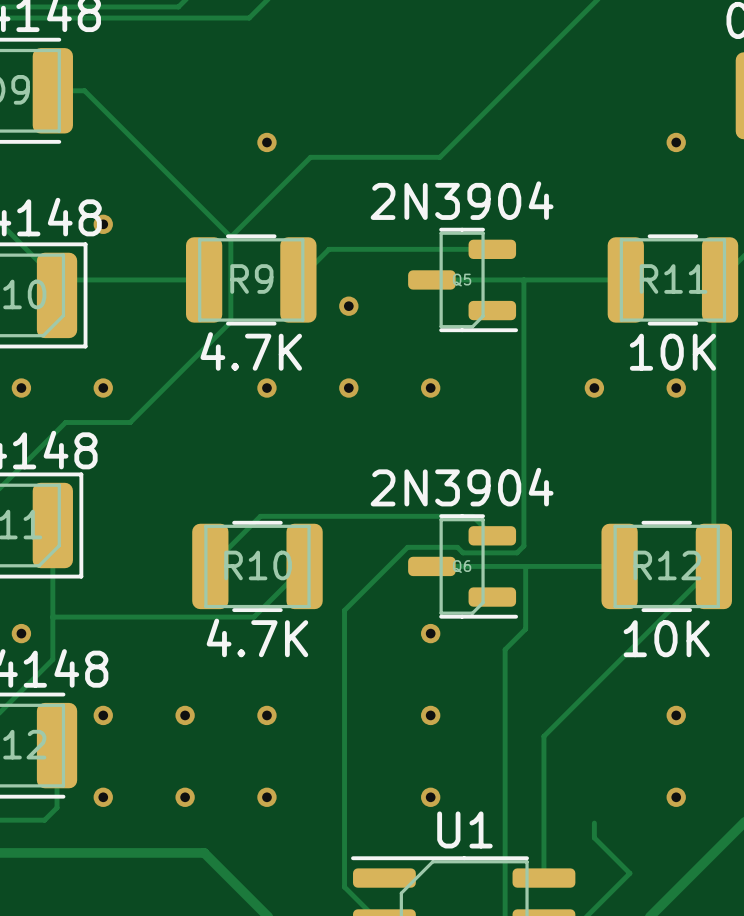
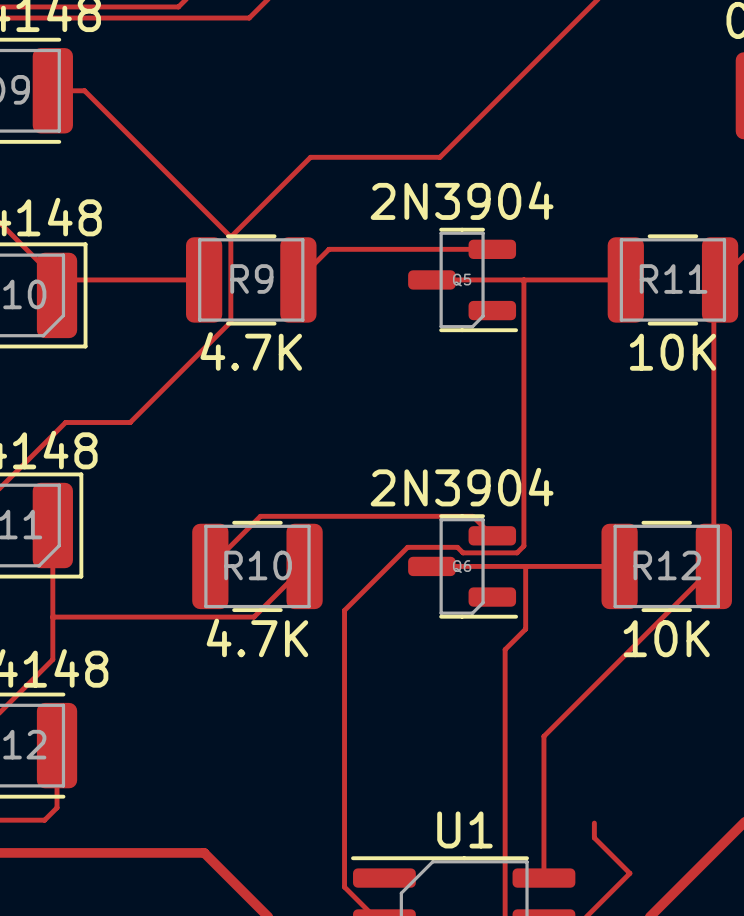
via: (266, 142) -> none
via: (676, 142) -> none
via: (103, 224) -> none
via: (348, 306) -> none
via: (21, 388) -> none
via: (103, 388) -> none
via: (266, 388) -> none
via: (348, 388) -> none
via: (430, 388) -> none
via: (594, 388) -> none
via: (676, 388) -> none
via: (21, 633) -> none
via: (430, 633) -> none
via: (103, 715) -> none
via: (185, 715) -> none
via: (266, 715) -> none
via: (430, 715) -> none
via: (676, 715) -> none
via: (103, 797) -> none
via: (185, 797) -> none
via: (266, 797) -> none
via: (430, 797) -> none
via: (676, 797) -> none

